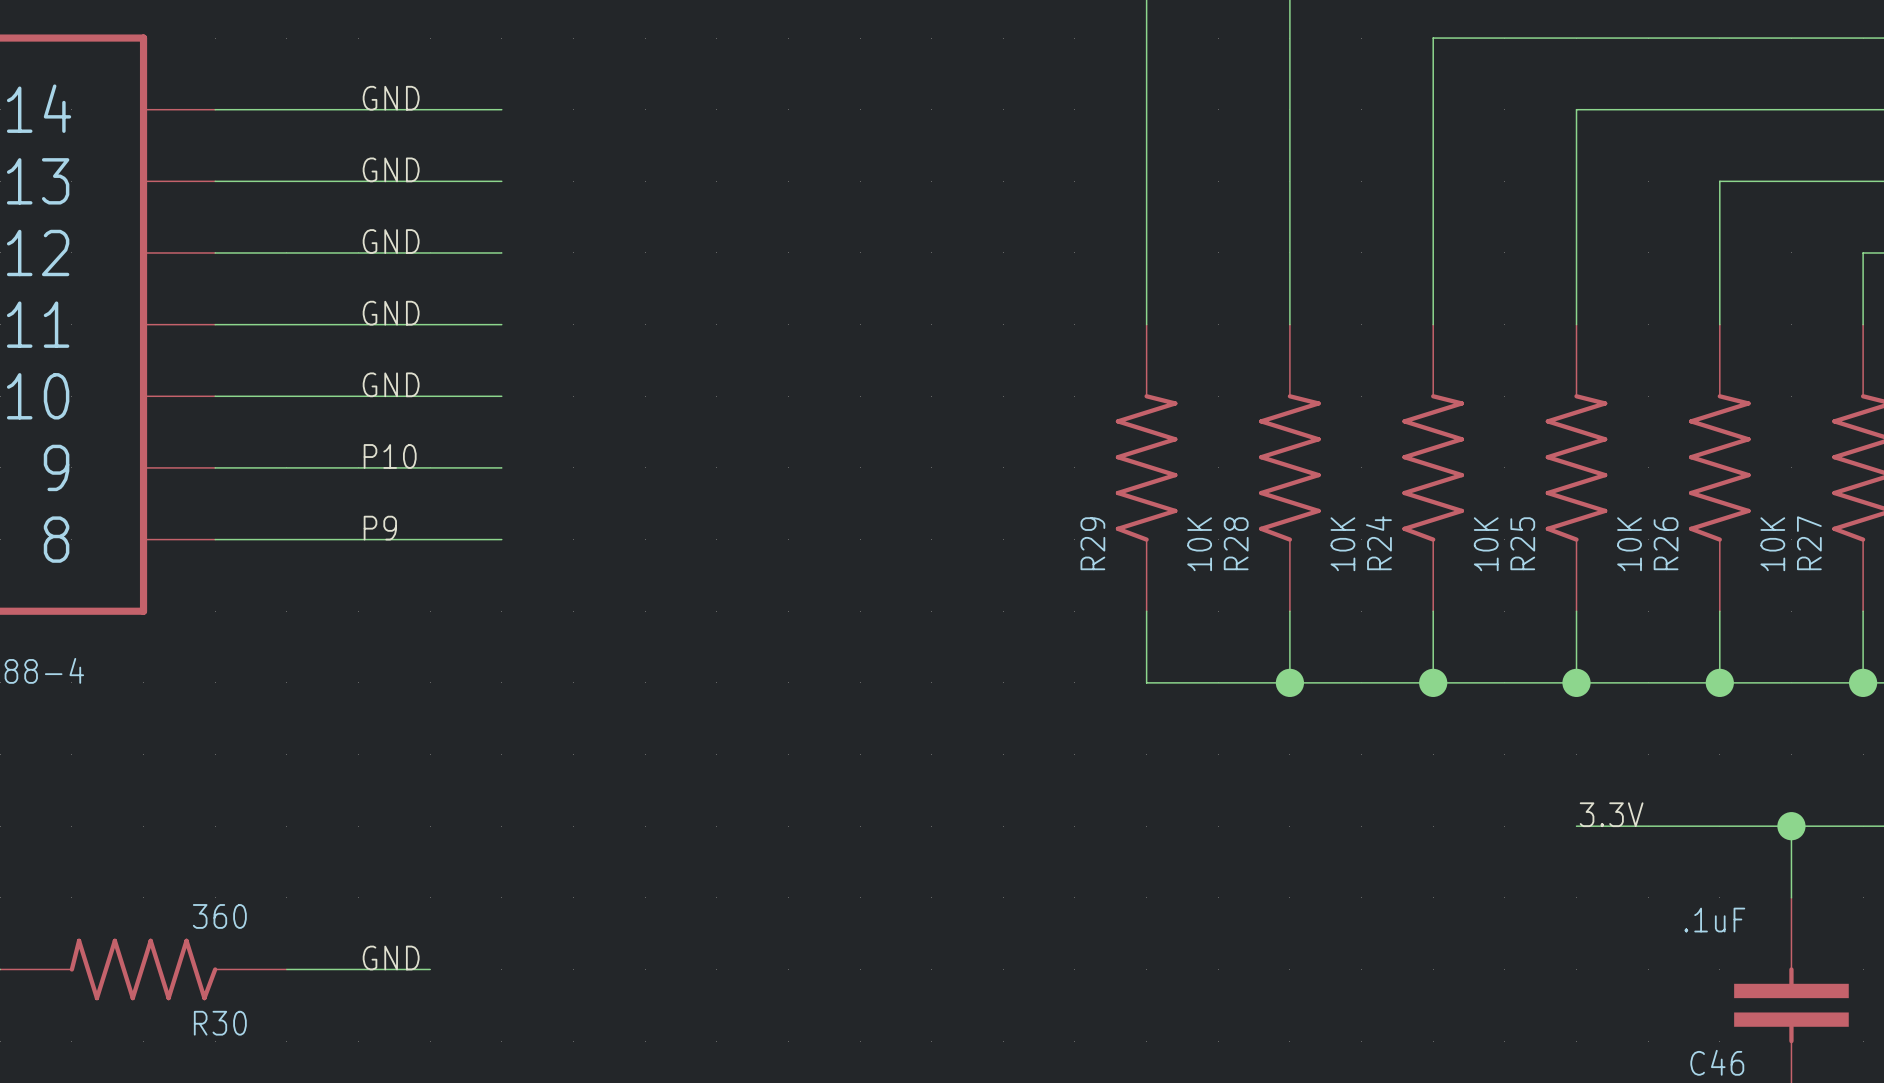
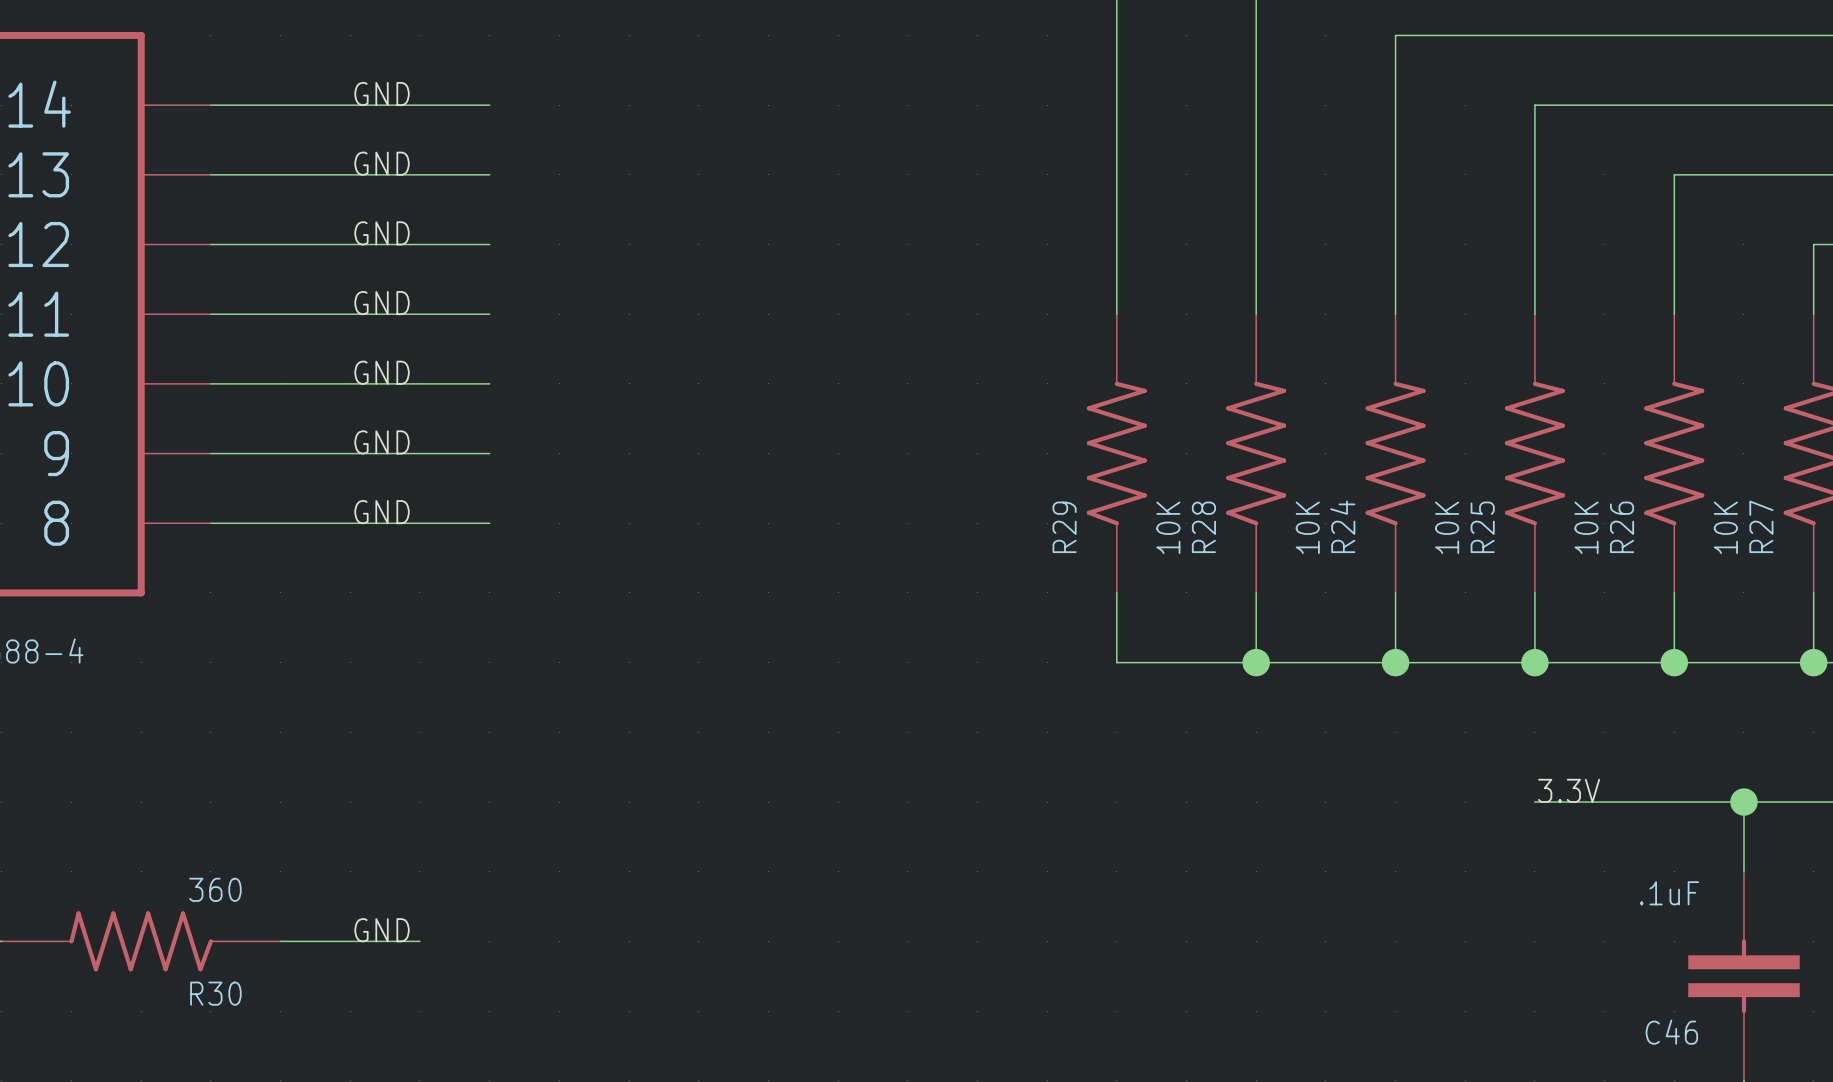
label: P10 (390, 456) -> GND (382, 442)
label: P9 (380, 528) -> GND (382, 512)

